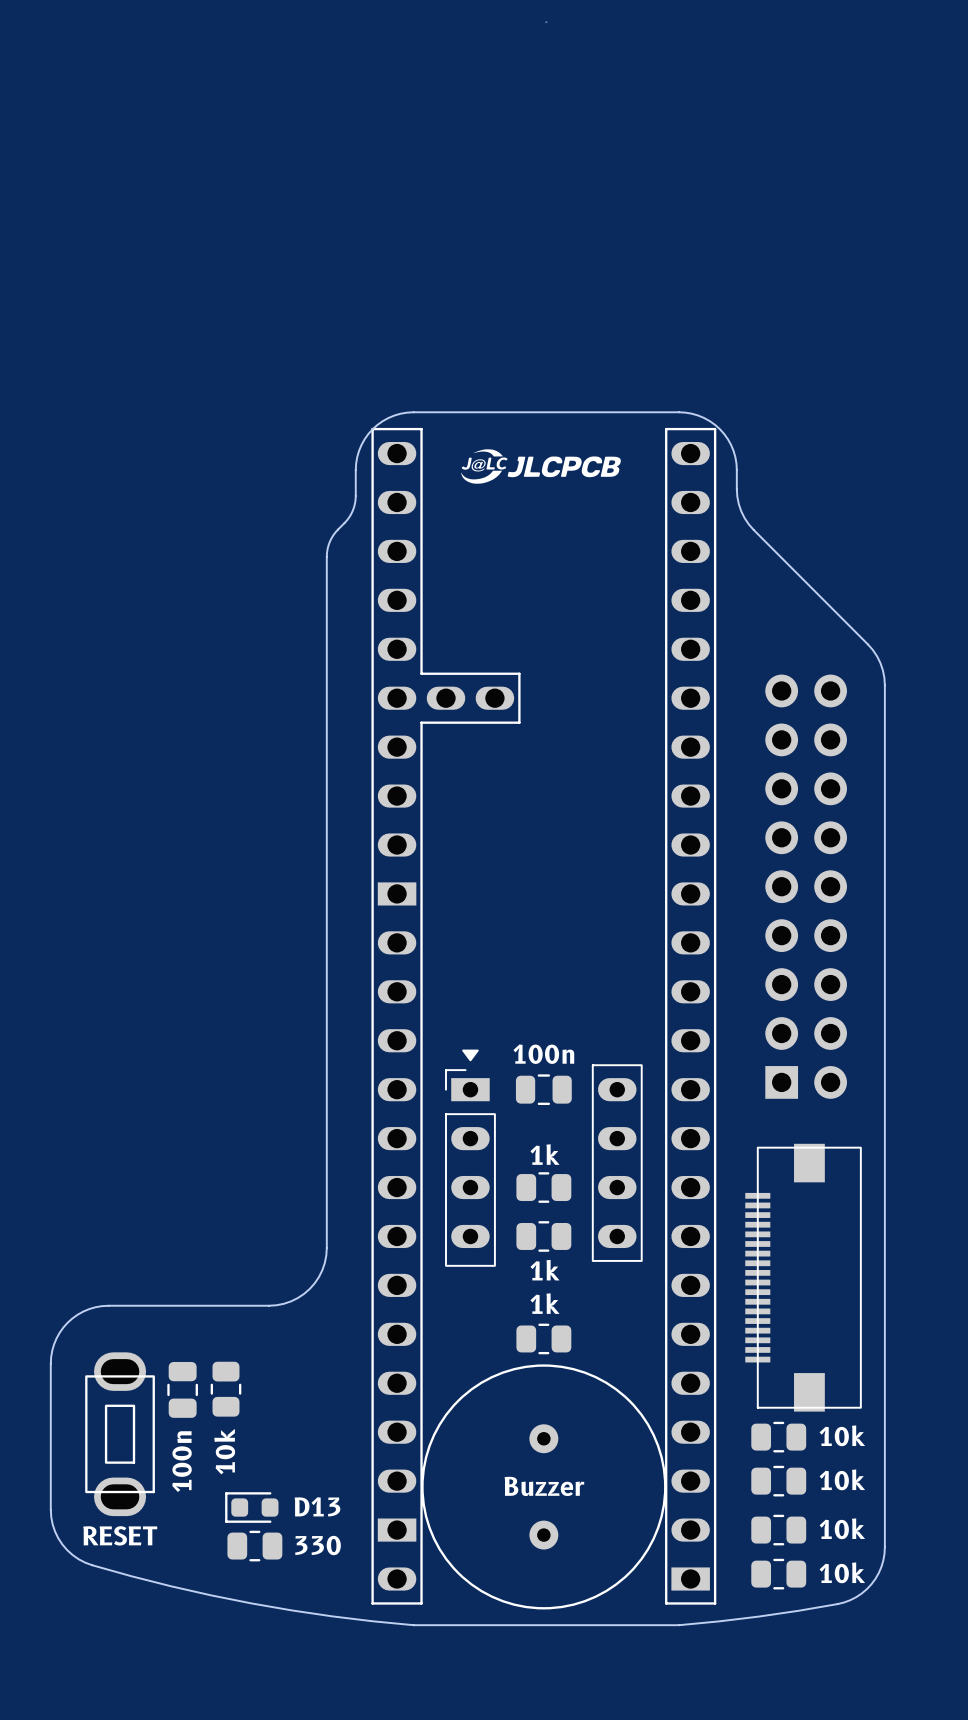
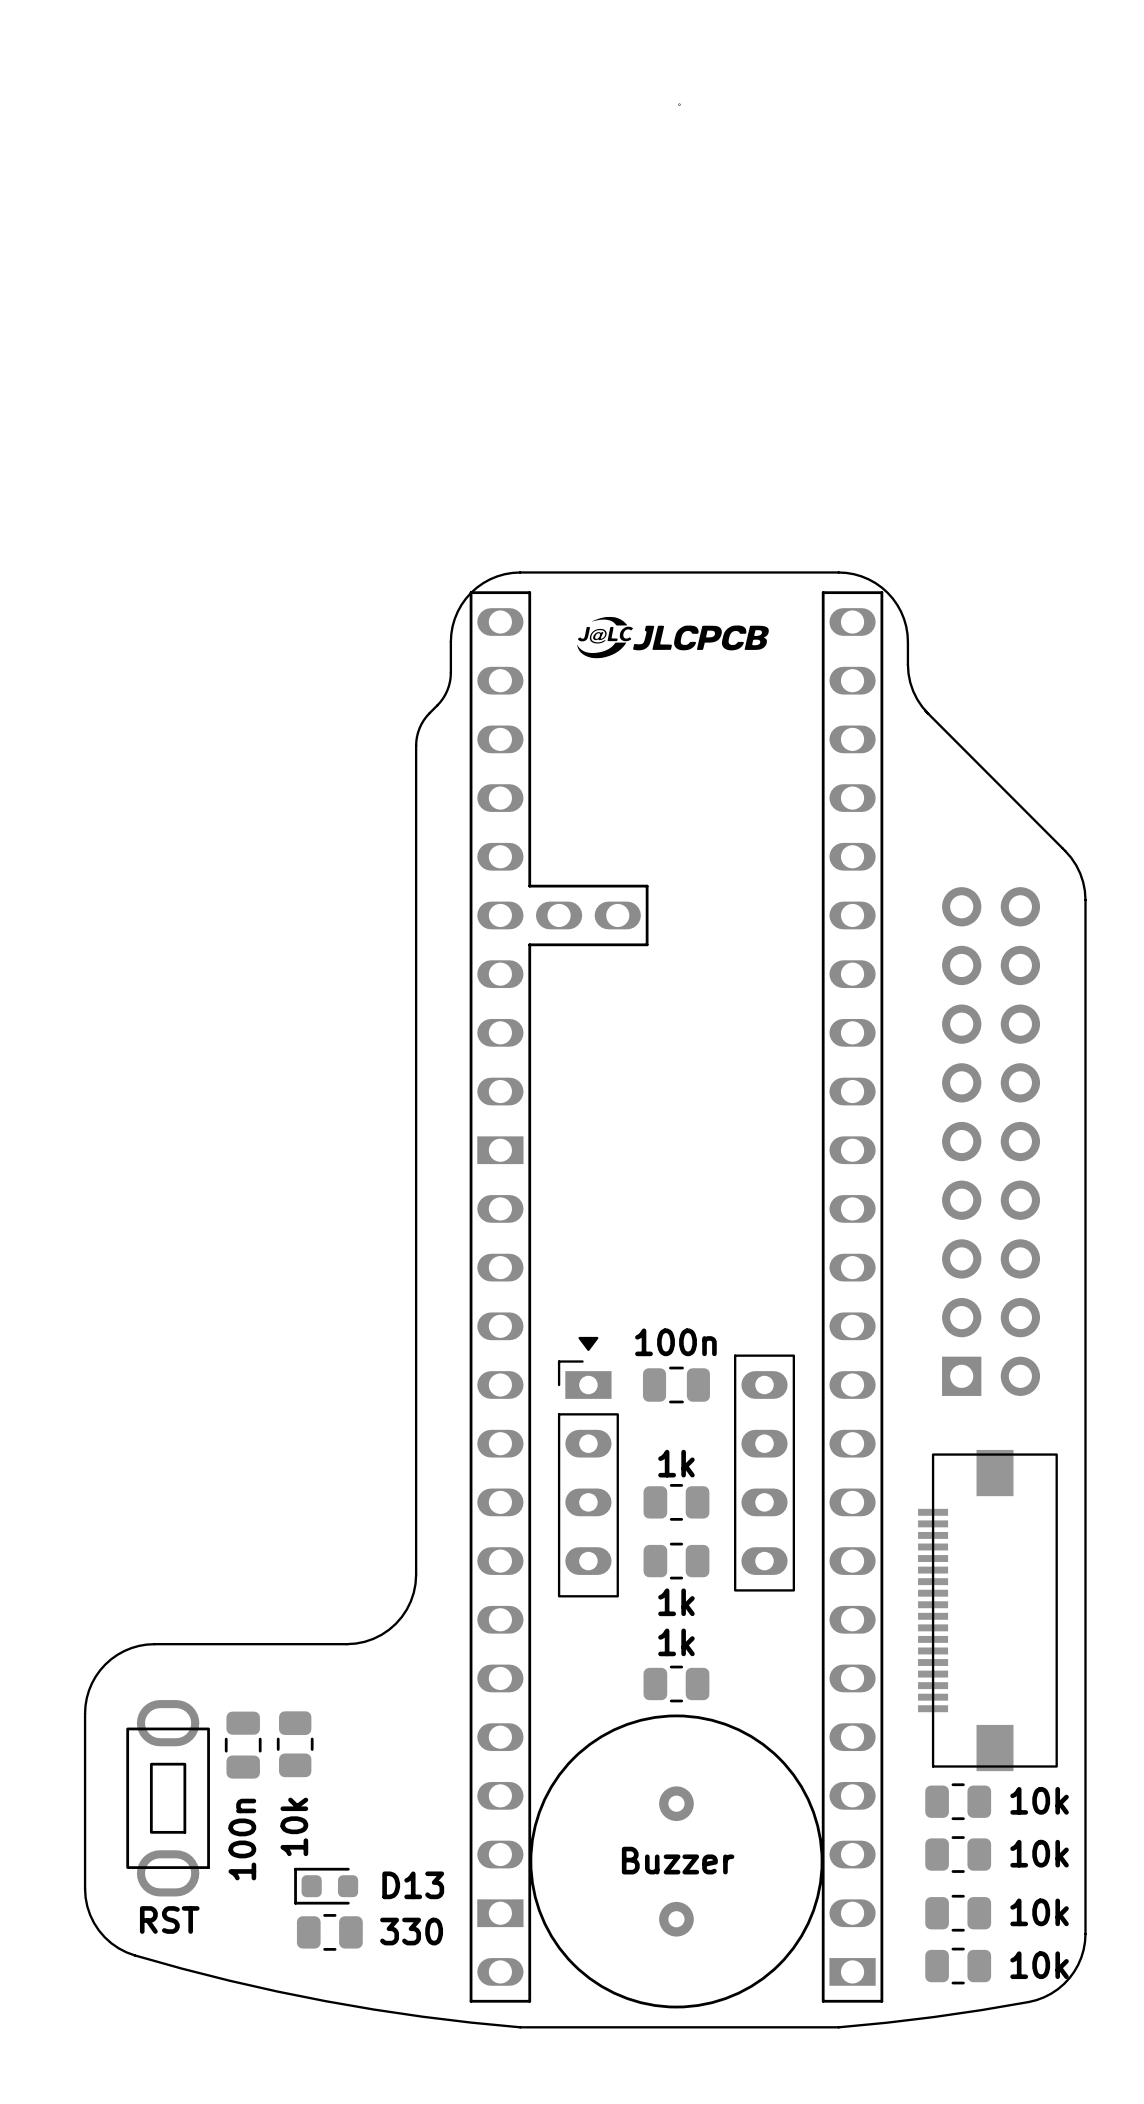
part value: RESET (120, 1535) -> RST (169, 1919)

